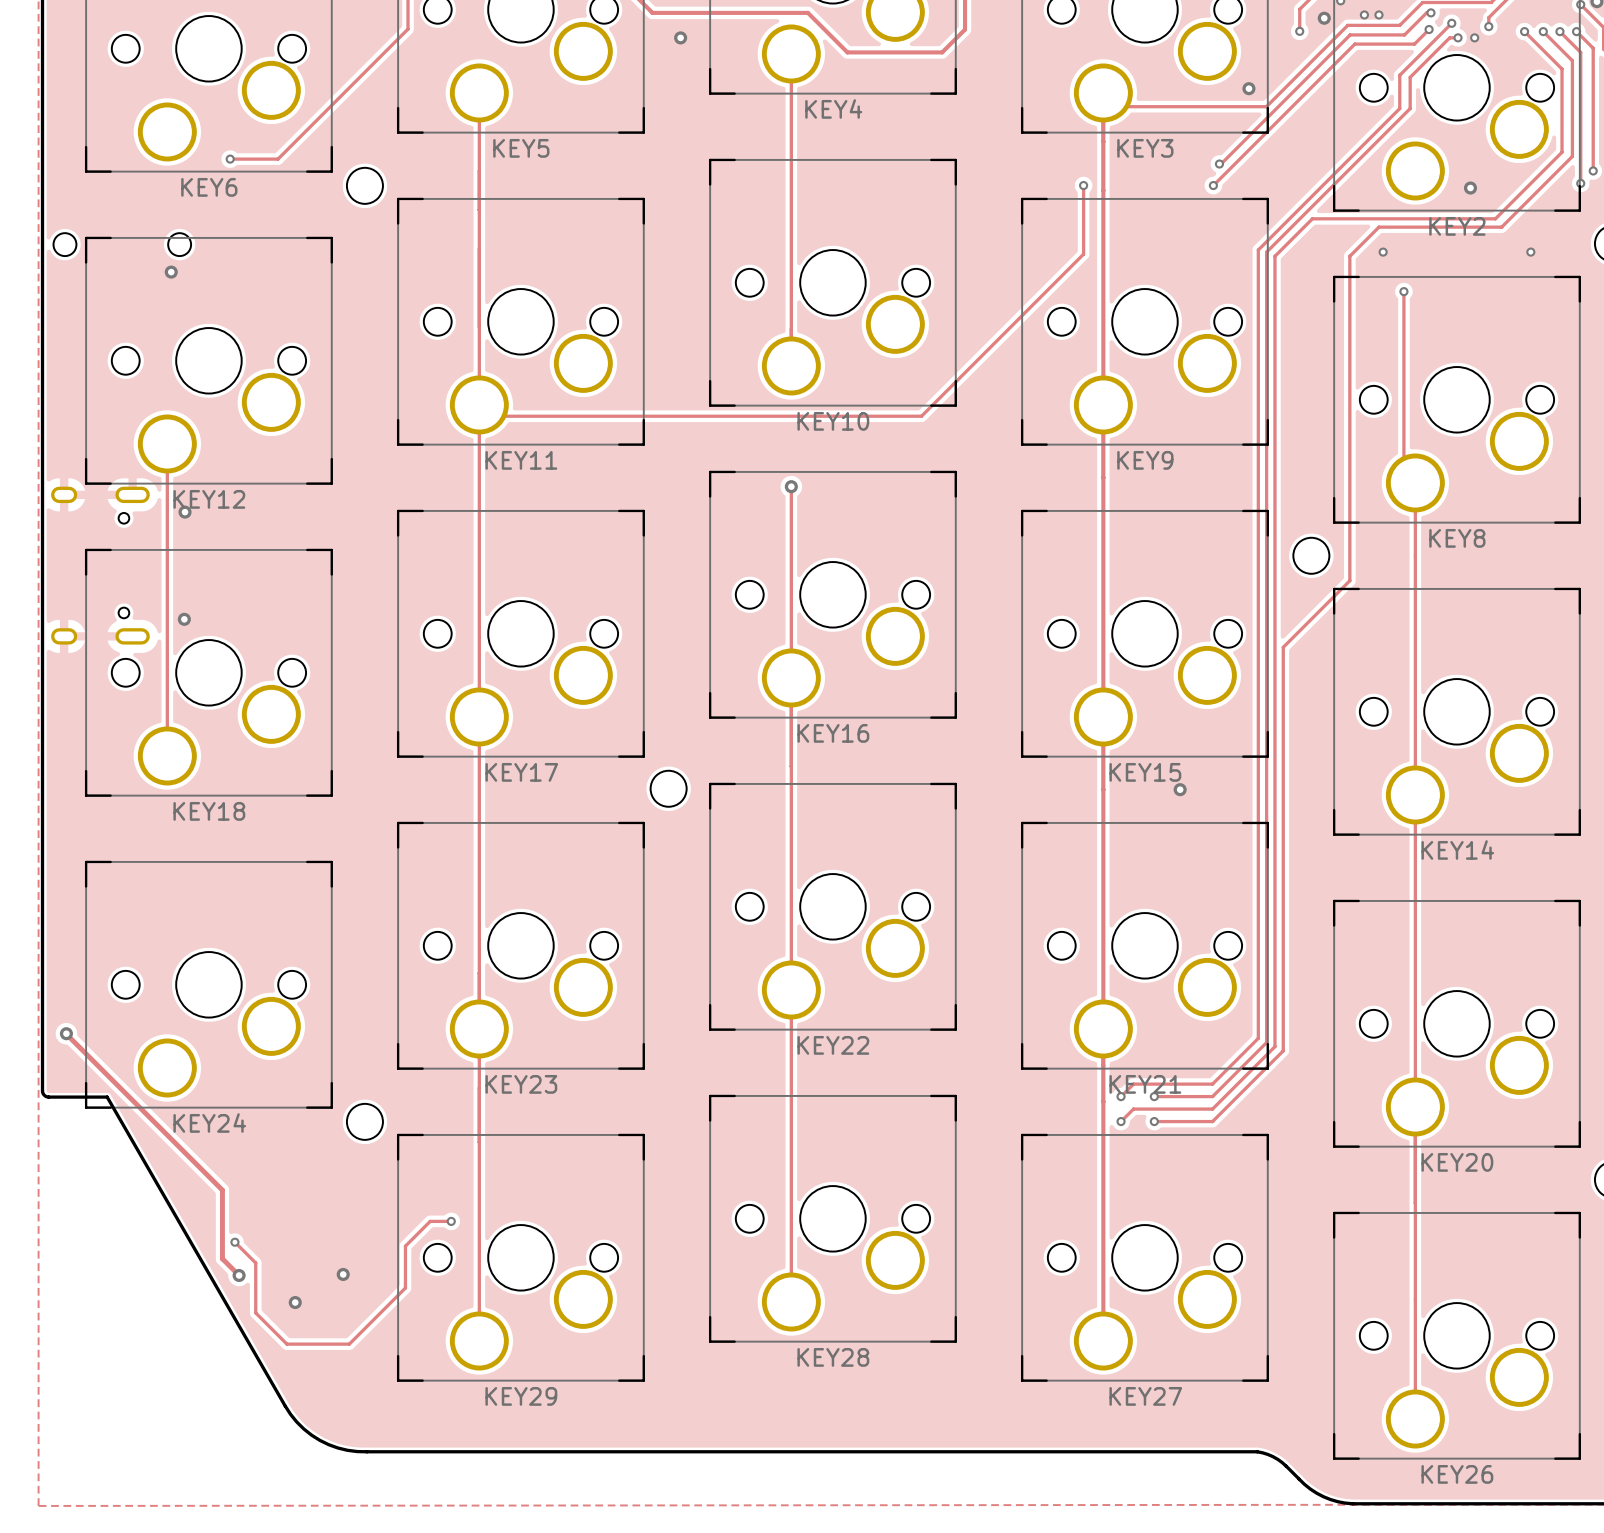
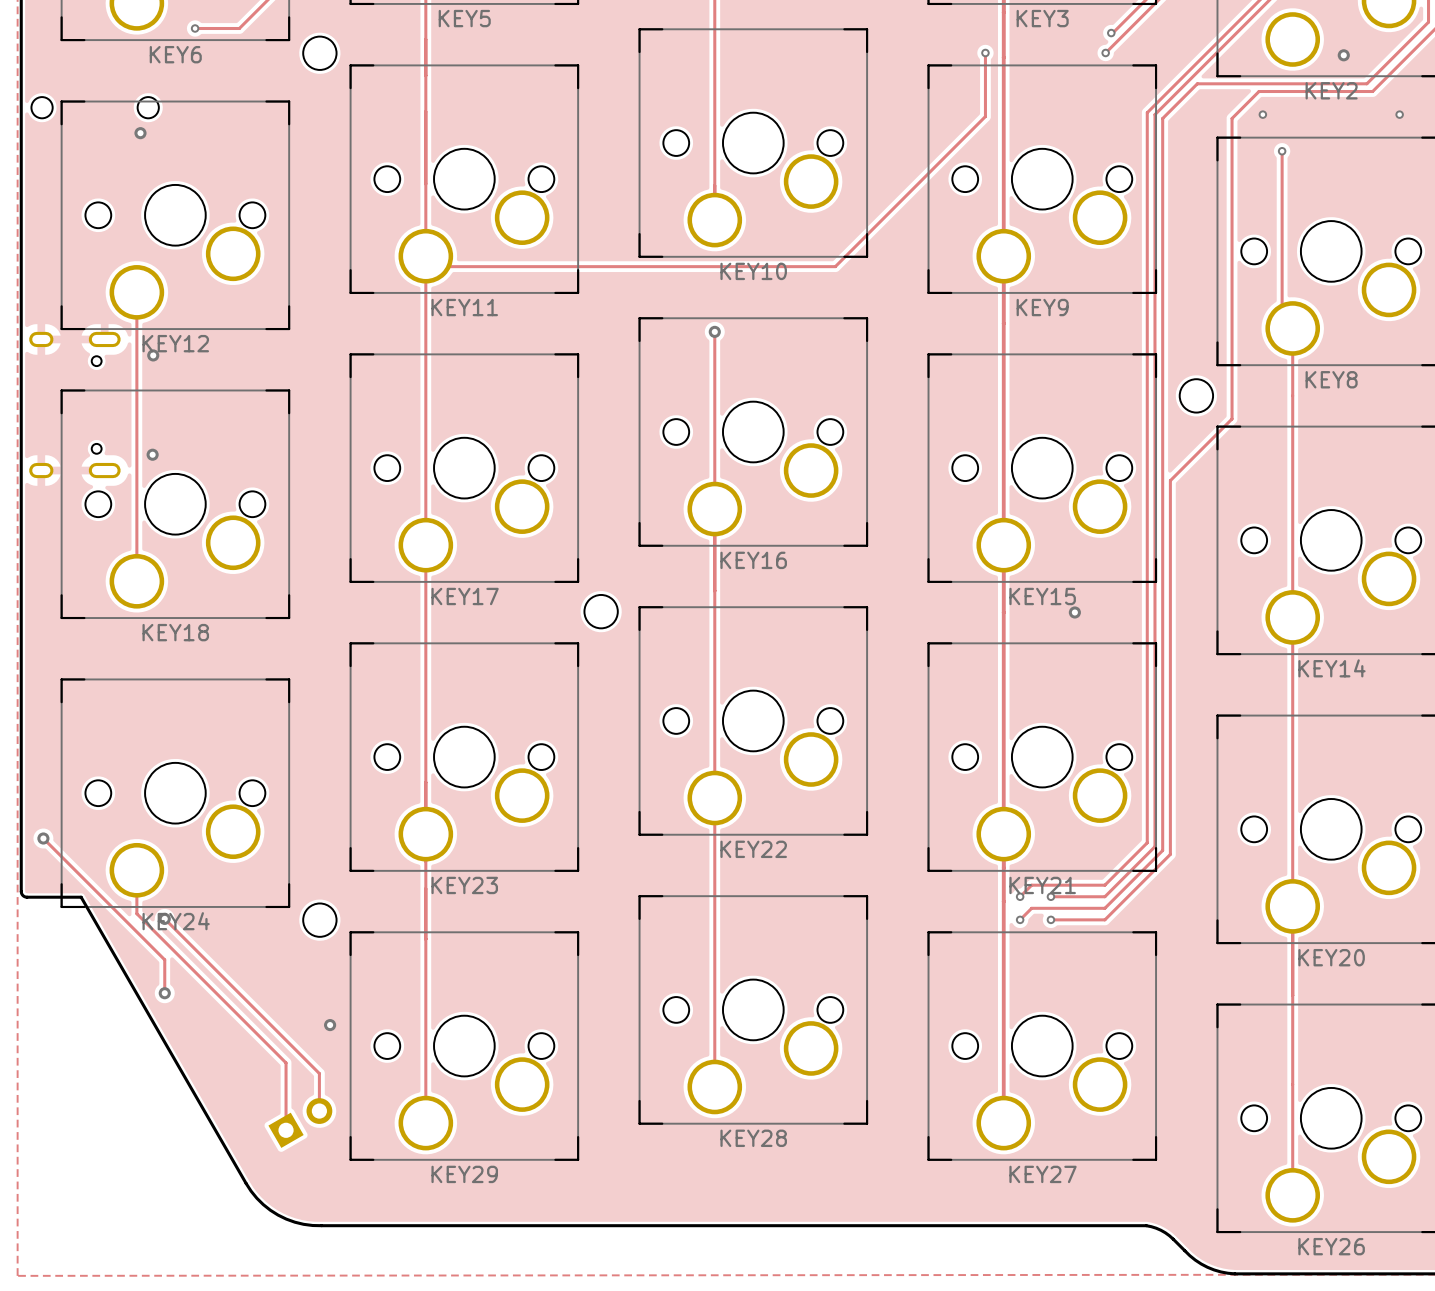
track: (66, 1034) (222, 1190) (222, 1258) (239, 1275) -> (43, 838) (164, 959) (164, 993)
track: none -> (136, 870) (136, 913) (286, 1062) (286, 1130)
track: none -> (164, 918) (319, 1073) (319, 1112)
via: none -> (164, 918)
via: none -> (164, 993)
track: (451, 1221) (430, 1221) (405, 1246) (405, 1288) (349, 1344) (286, 1344) (255, 1312) (255, 1263) (234, 1242) -> none
via: (451, 1221) -> none
via: (234, 1242) -> none
via position: (343, 1274) -> (330, 1025)
via: (239, 1275) -> none
via: (295, 1302) -> none
part: none -> (300, 1123)

